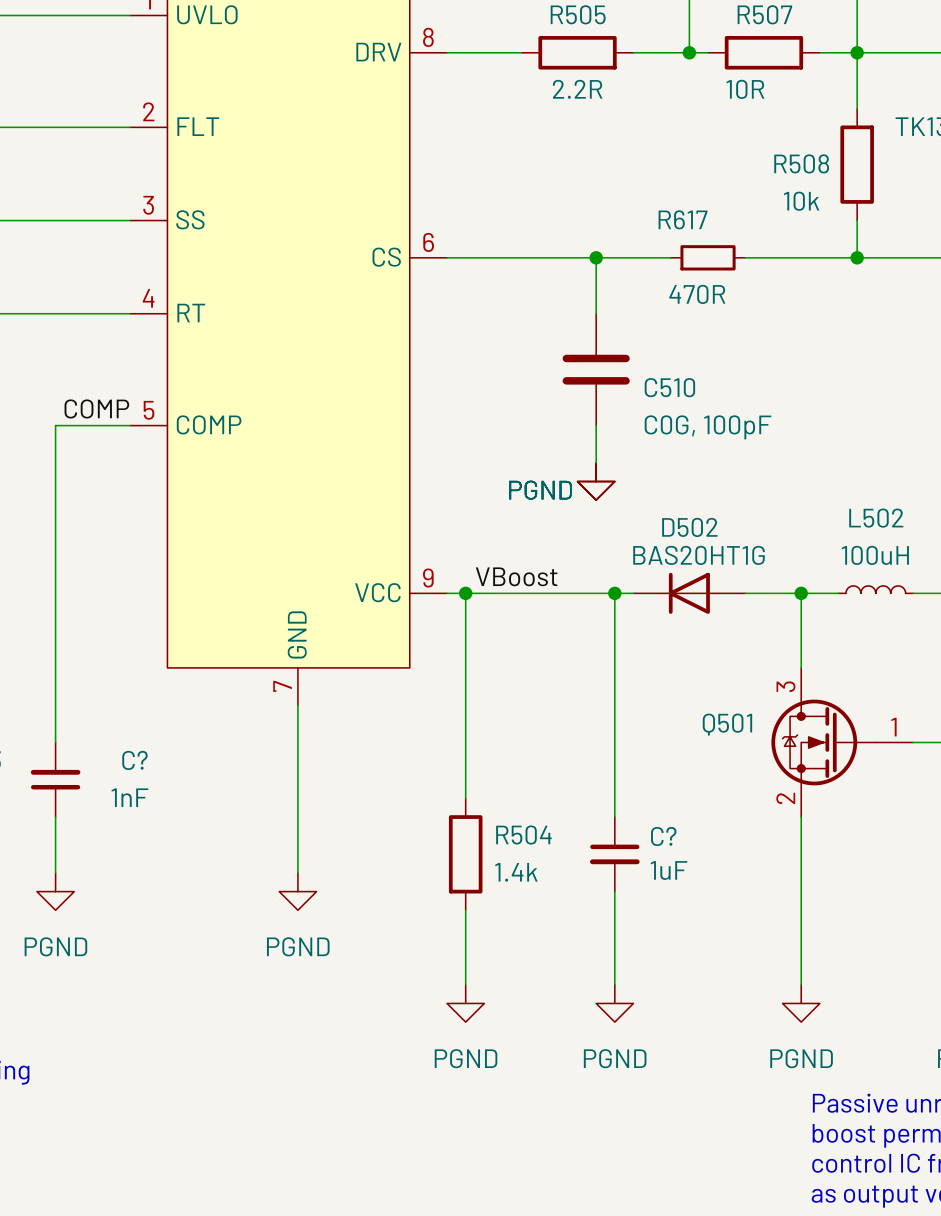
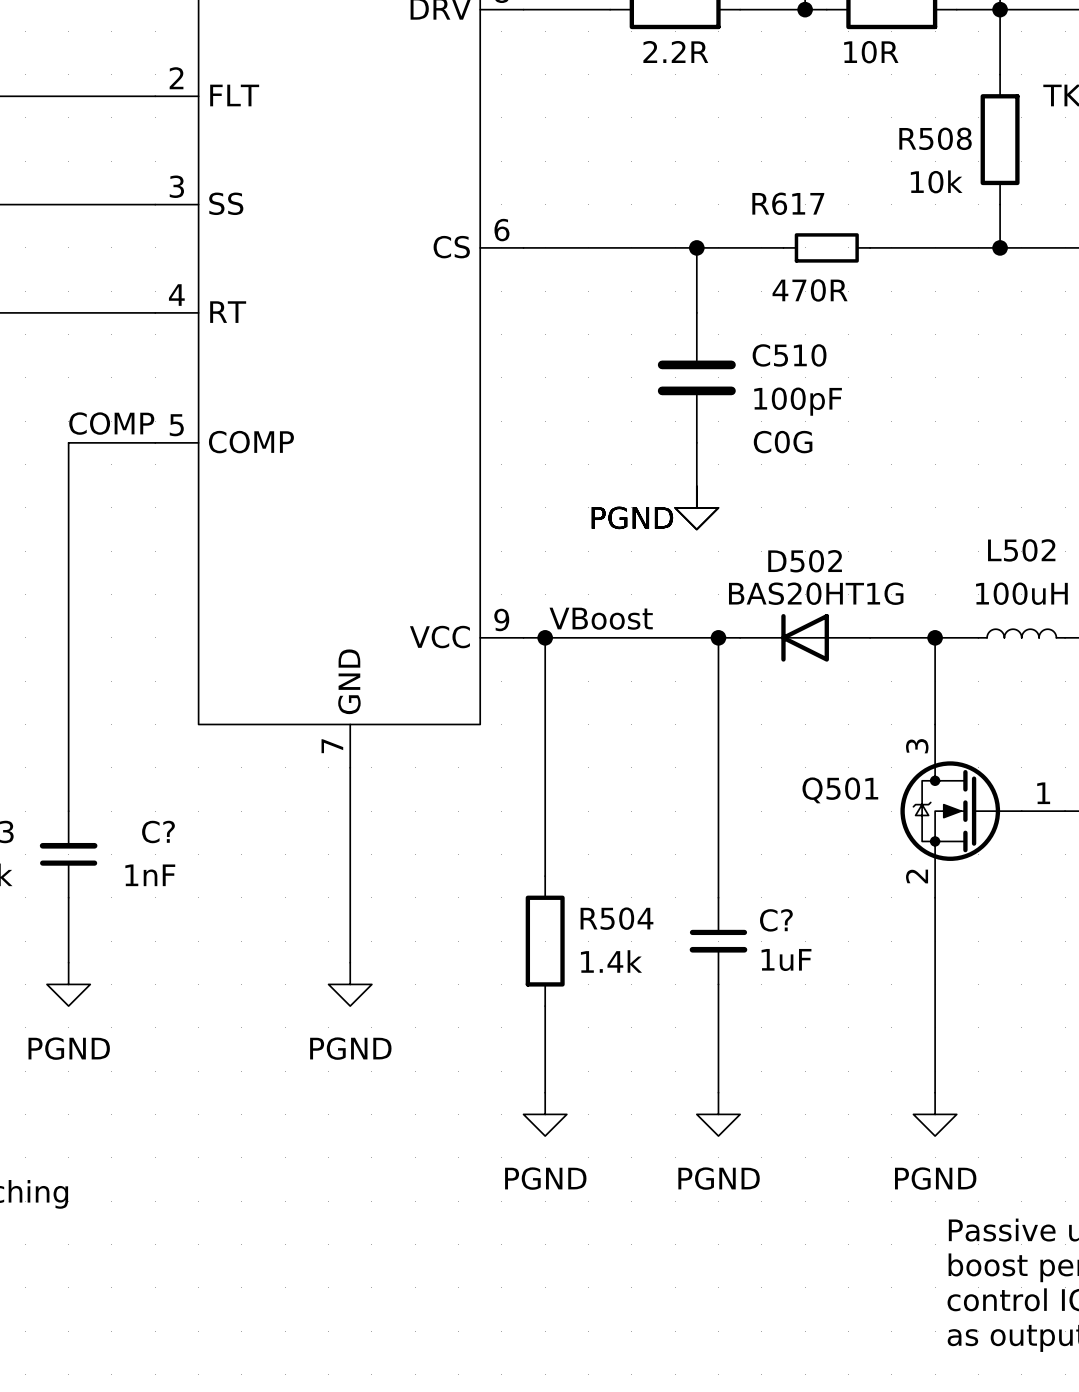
C510 name position: C510 (669, 387) -> C510 (789, 355)
C510 text: none -> C0G (783, 442)
C510 value: C0G, 100pF (708, 427) -> 100pF (798, 401)

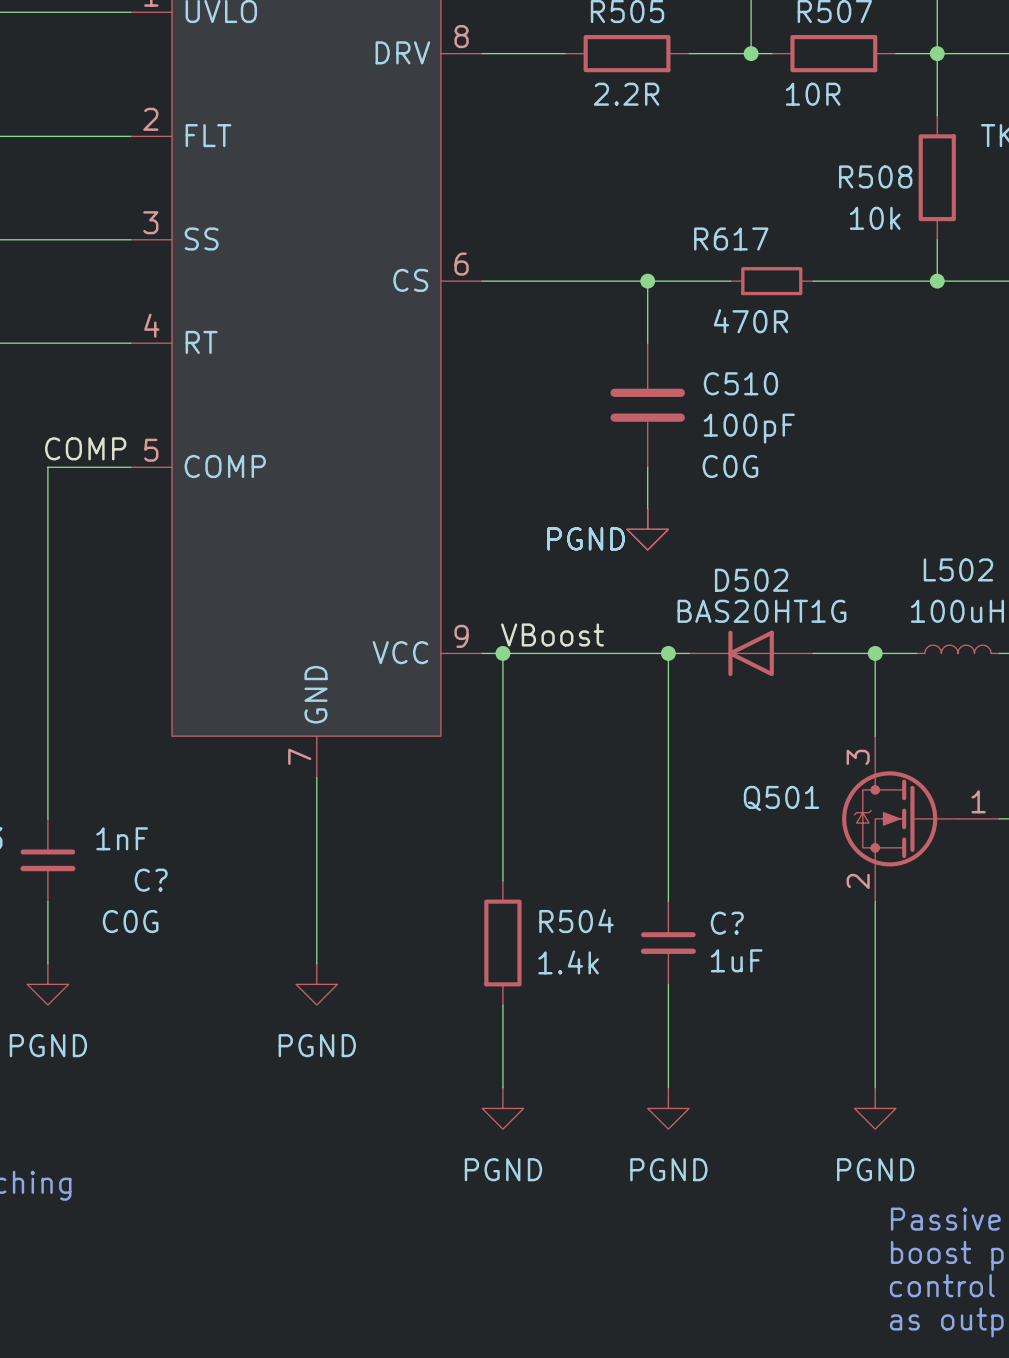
C? name position: C? (158, 832) -> C? (151, 880)
C? rotation: 0° (68, 854) -> 180° (47, 860)
C? value position: 1nF (150, 875) -> 1nF (122, 838)
C? text: none -> C0G (130, 921)

